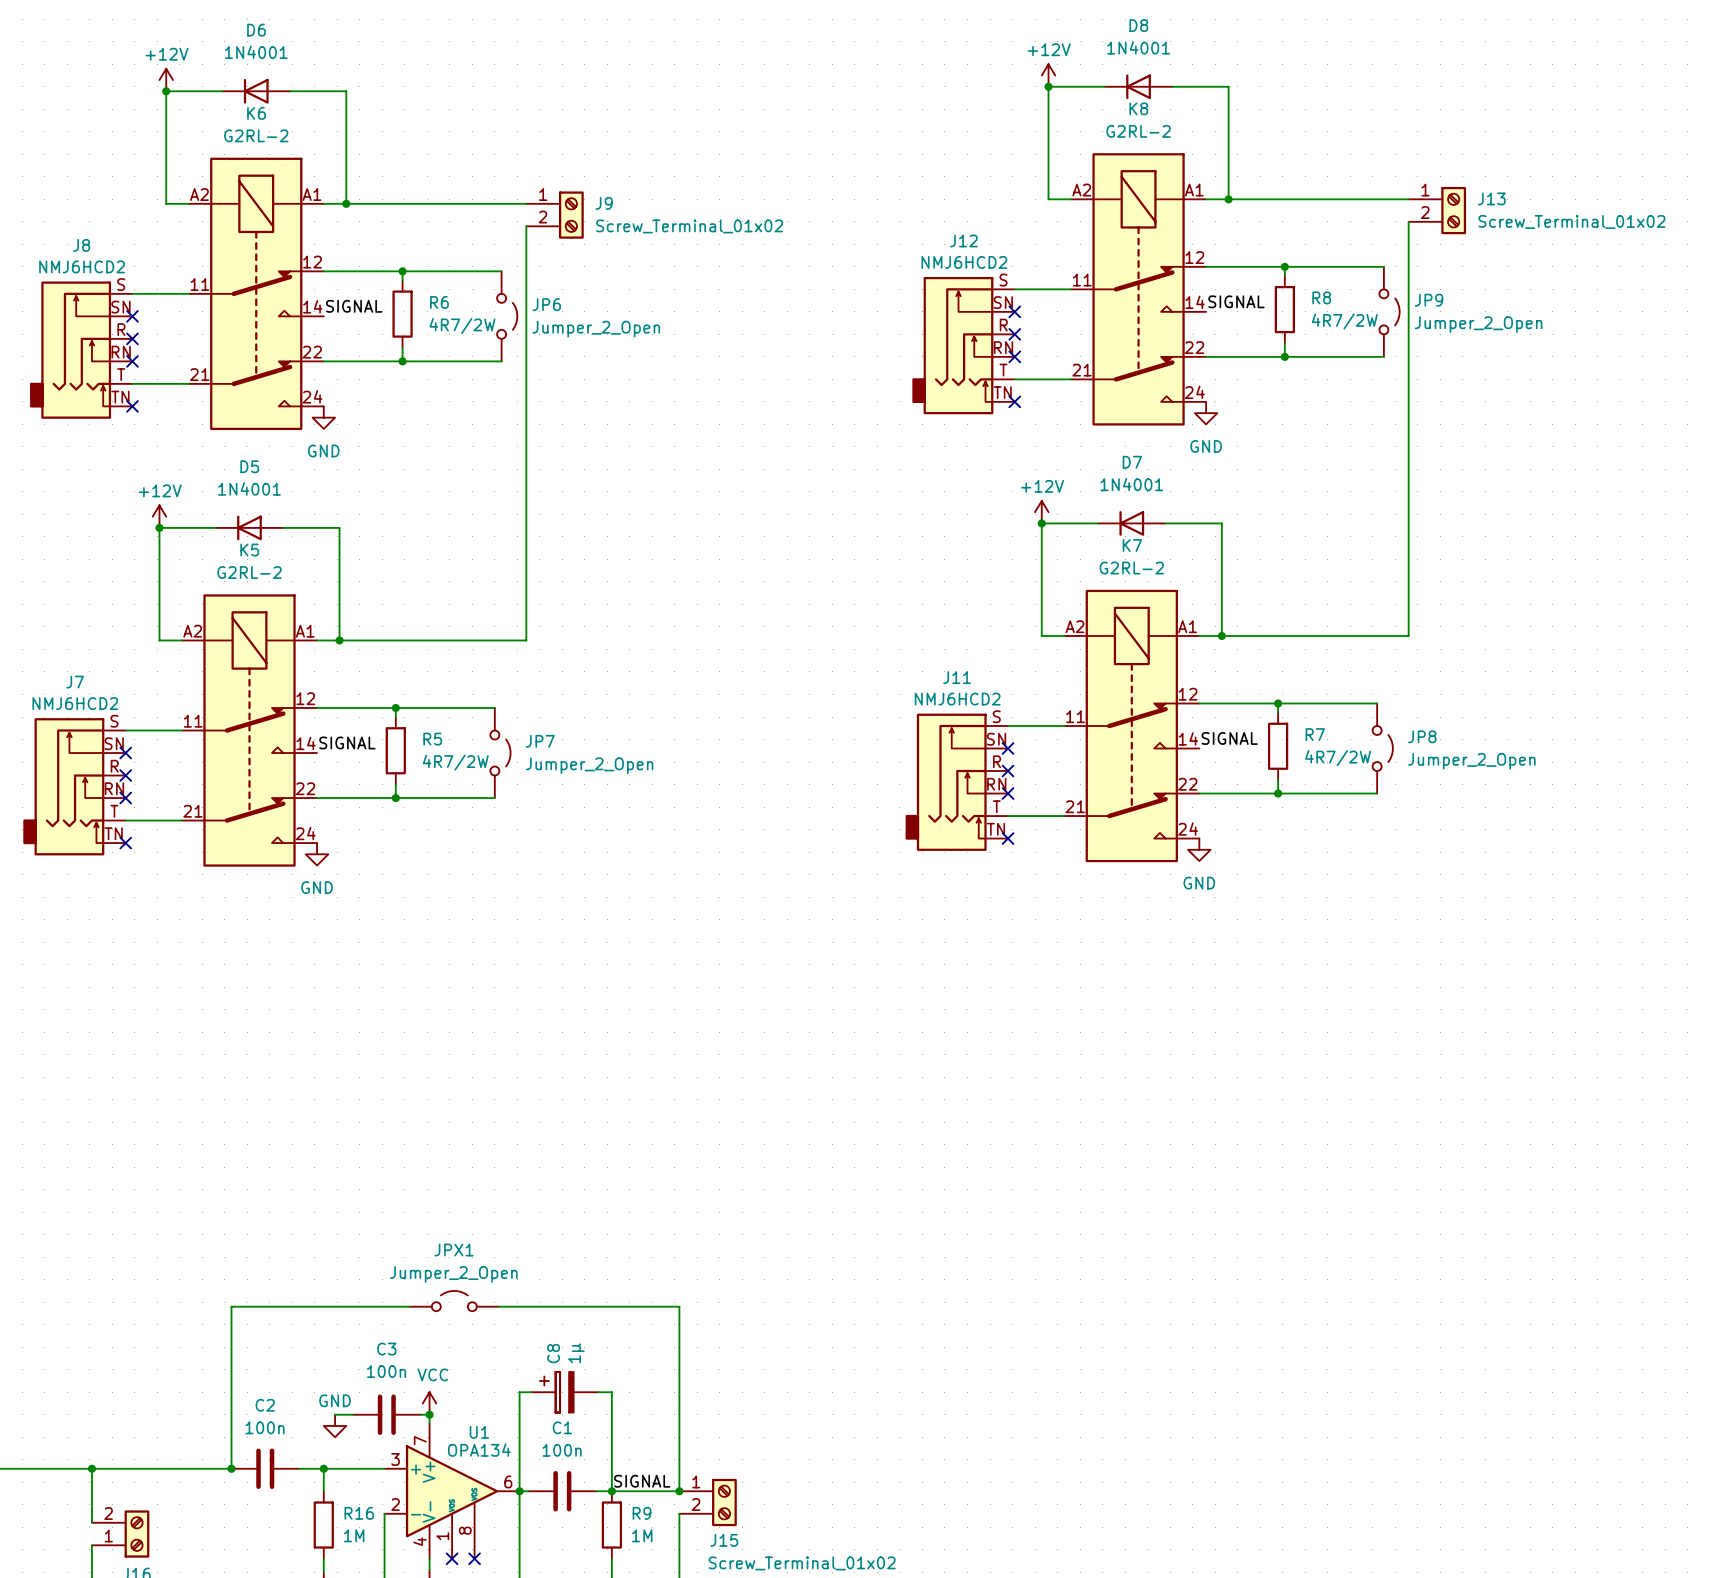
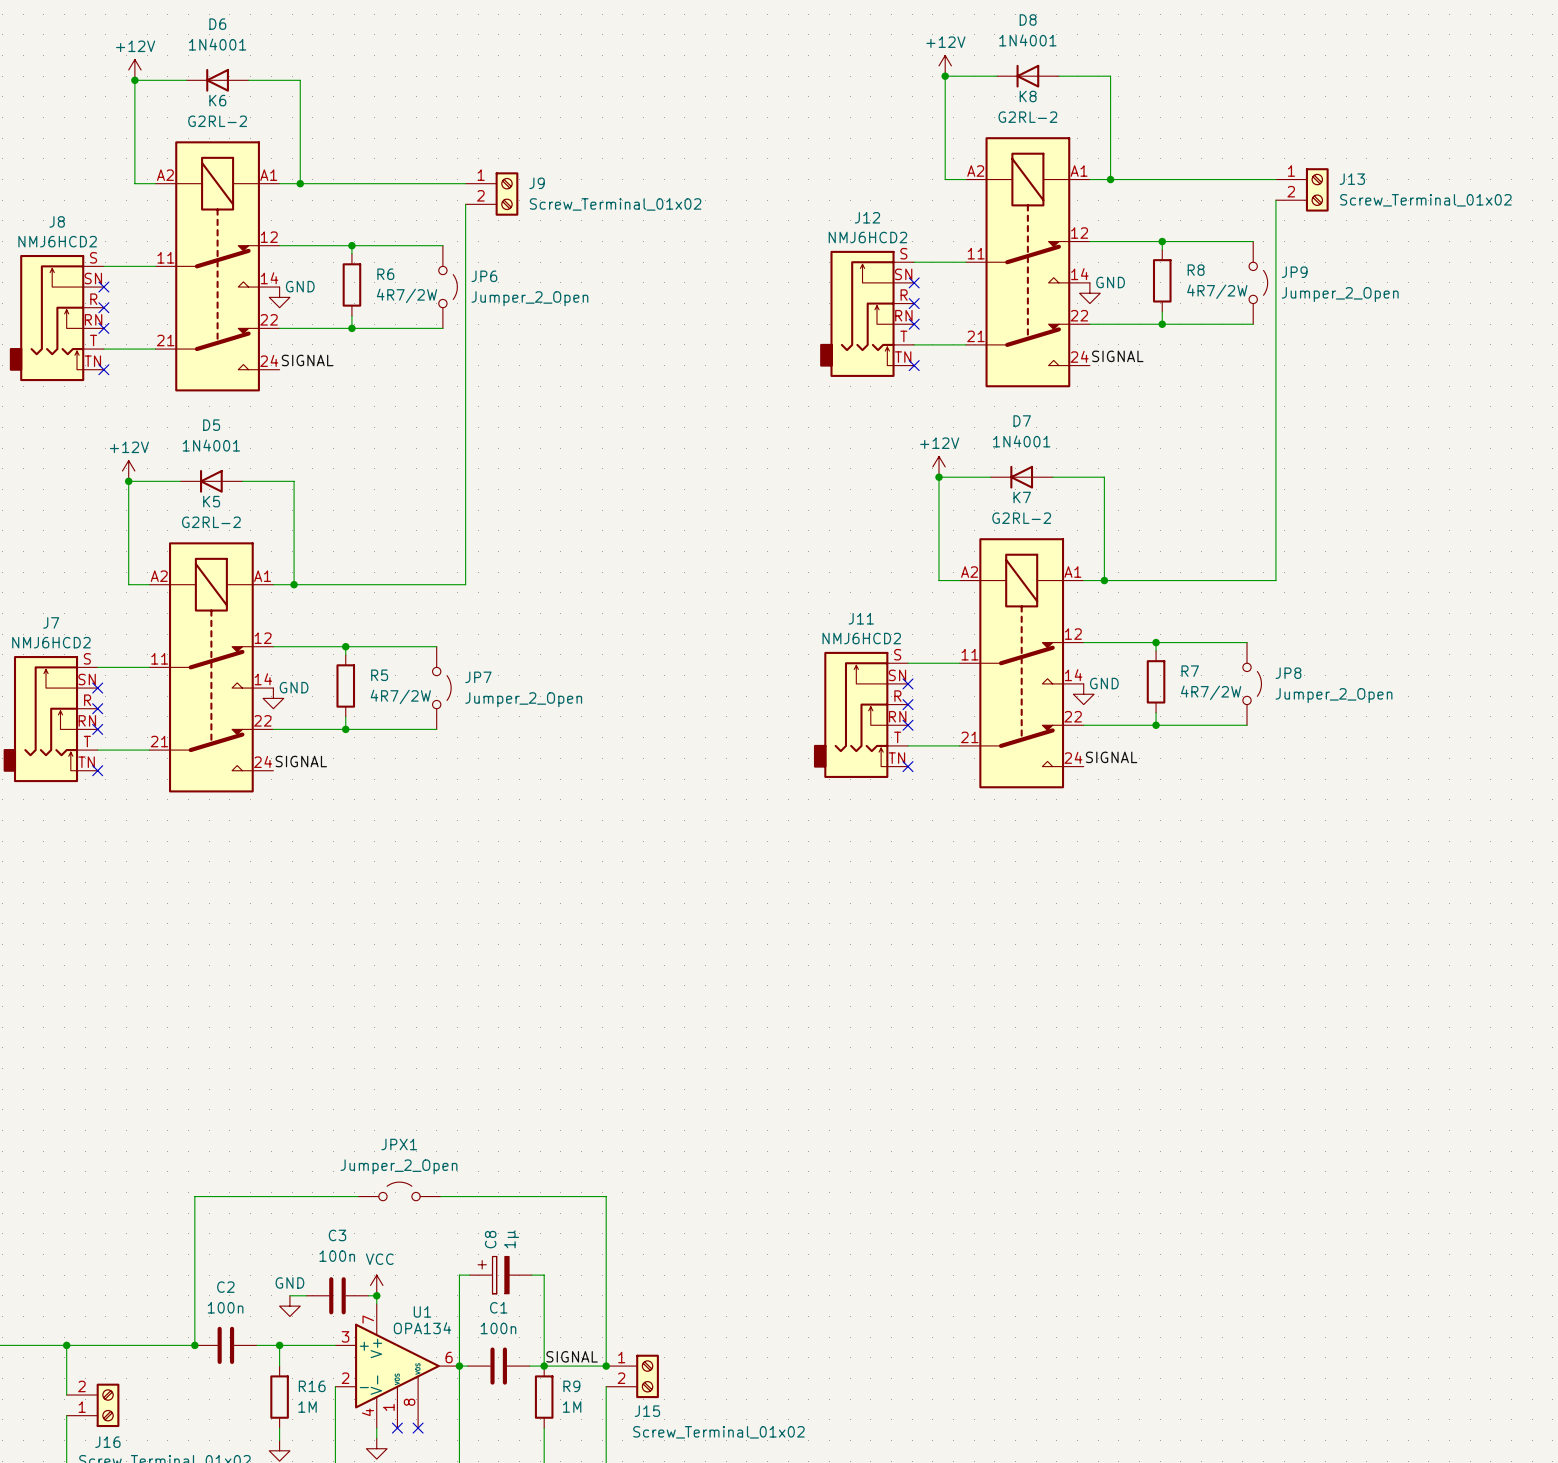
label position: SIGNAL (1236, 301) -> SIGNAL (1117, 356)
label position: SIGNAL (354, 306) -> SIGNAL (307, 360)
power symbol position: GND (1206, 413) -> GND (1089, 293)
power symbol position: GND (323, 417) -> GND (279, 297)
power symbol text position: GND (1206, 446) -> GND (1110, 282)
power symbol text position: GND (323, 450) -> GND (300, 286)
label position: SIGNAL (1229, 738) -> SIGNAL (1111, 757)
label position: SIGNAL (347, 742) -> SIGNAL (301, 761)
power symbol position: GND (1199, 849) -> GND (1083, 694)
power symbol position: GND (317, 854) -> GND (273, 698)
power symbol text position: GND (1199, 883) -> GND (1104, 683)
power symbol text position: GND (317, 887) -> GND (294, 687)

